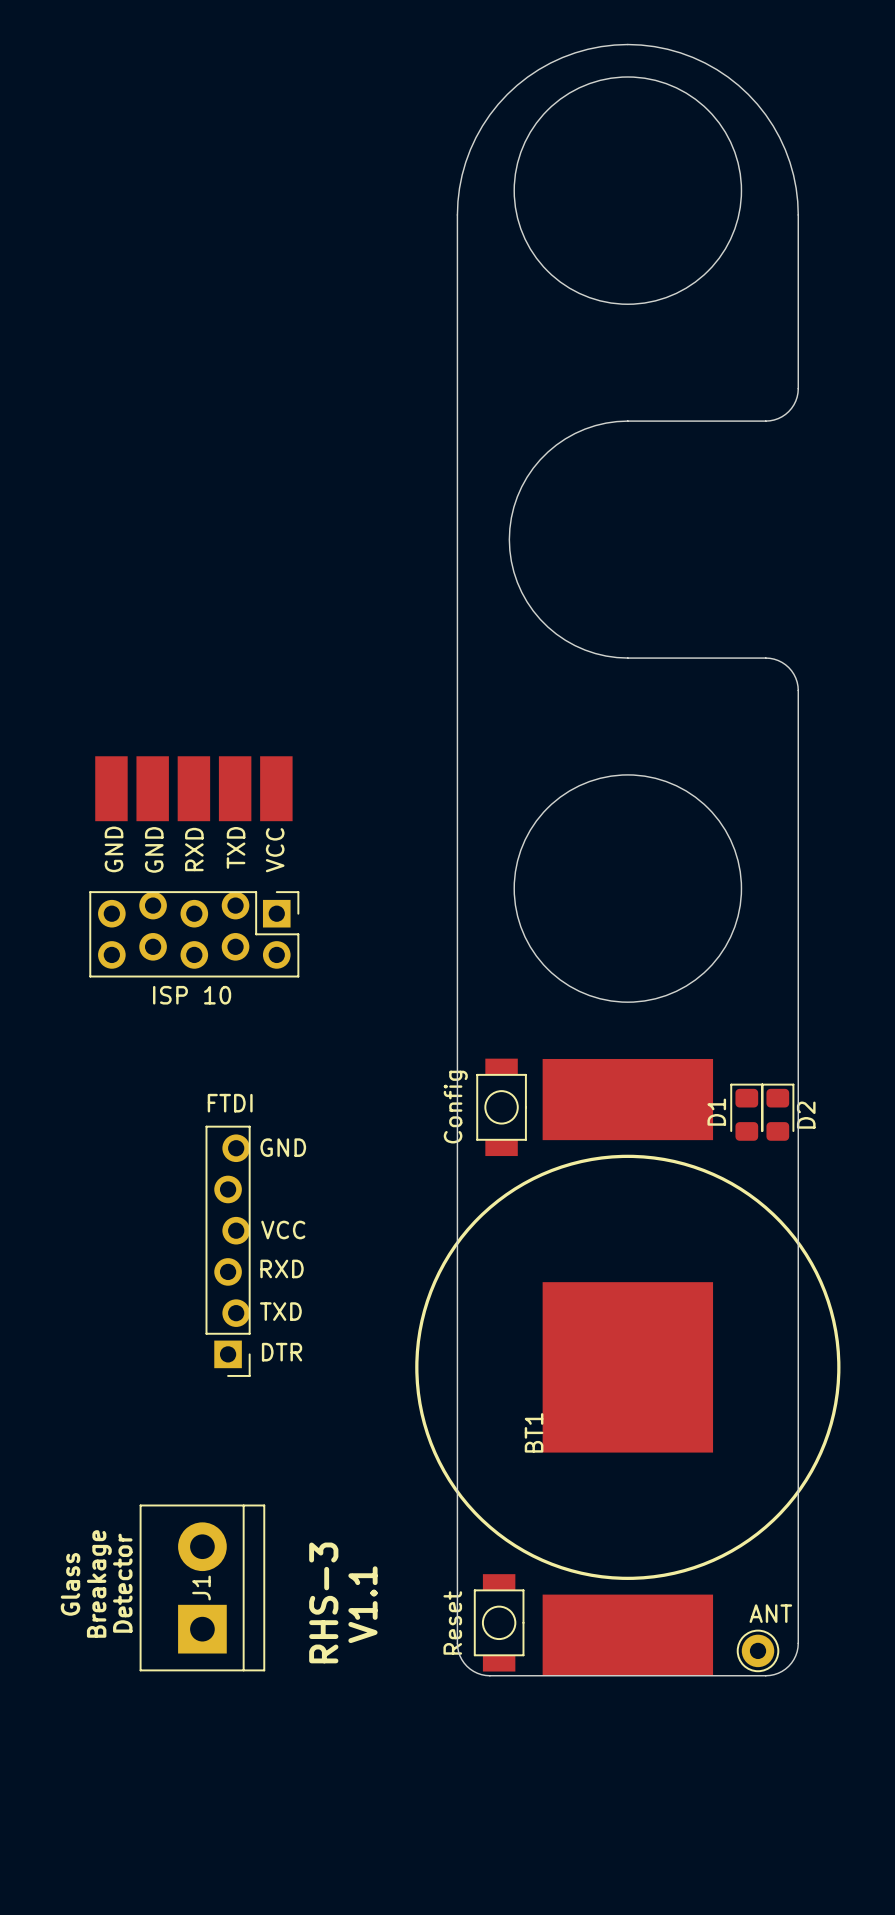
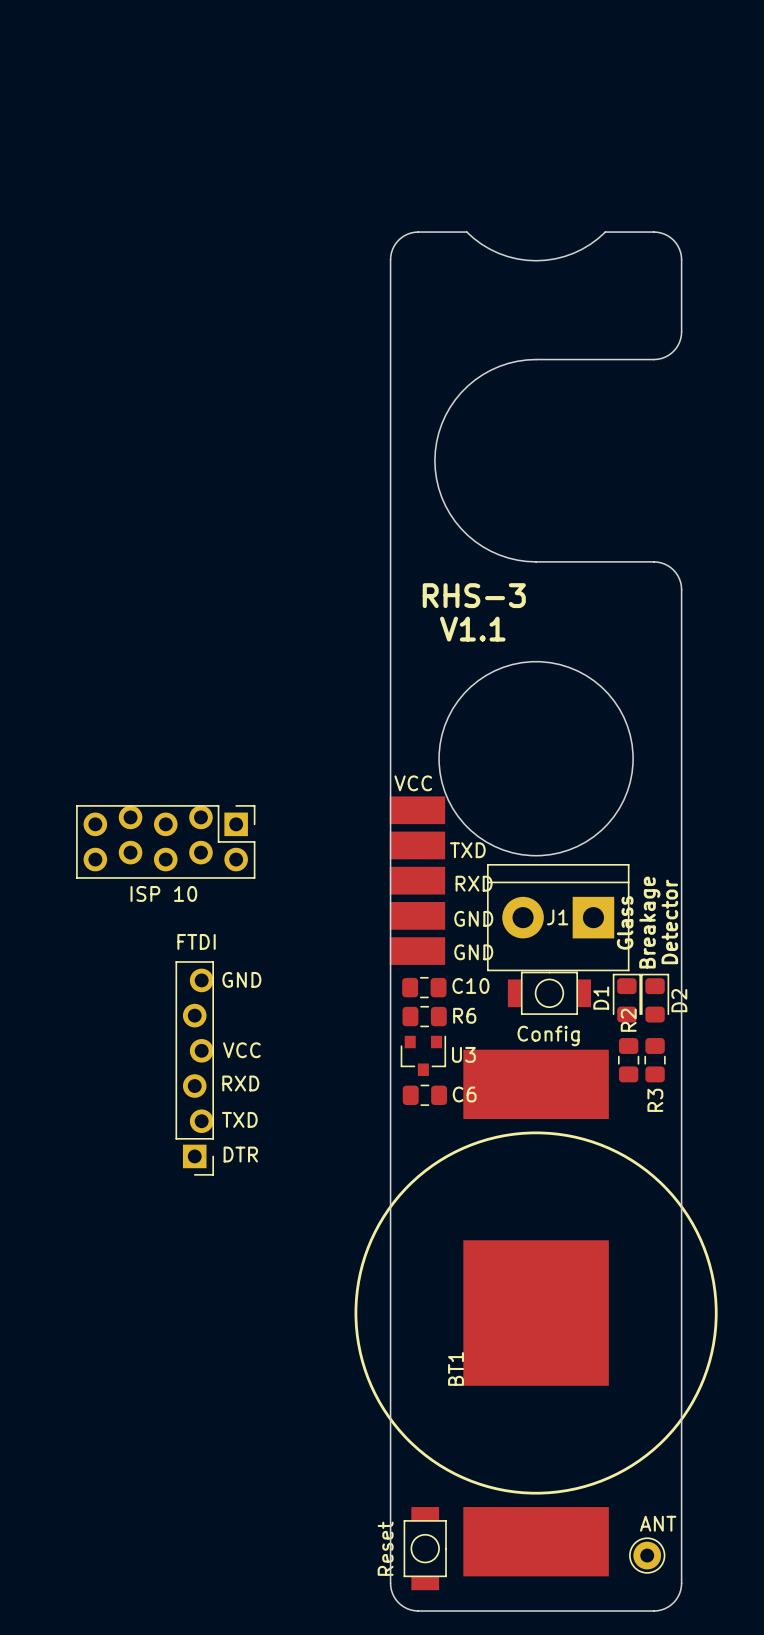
round board edge: [513, 76, 742, 305] -> none
board edge: (457, 304) (457, 214) (459, 188) (470, 149) (482, 125) (498, 104) (517, 85) (550, 63) (588, 49) (627, 44) (667, 49) (705, 63) (738, 85) (757, 104) (773, 125) (785, 149) (796, 188) (798, 214) (798, 304) -> (390, 259) (392, 249) (398, 240) (407, 234) (418, 232) (466, 232) (481, 244) (498, 253) (516, 258) (536, 260) (555, 258) (573, 253) (590, 244) (605, 232) (657, 232) (667, 235) (675, 242) (681, 259)
text: none -> RHS-3 (474, 595)
text: none -> V1.1 (472, 629)
part rotation: 0° (193, 788) -> 90° clockwise (417, 880)
part position: (193, 788) -> (417, 880)
text rotation: 0° (236, 847) -> 90° clockwise (467, 850)
text position: TXD (236, 847) -> TXD (467, 850)
text: GND (114, 849) -> none
text: GND (154, 849) -> none
text rotation: 0° (194, 849) -> 90° clockwise (474, 883)
text position: RXD (194, 849) -> RXD (474, 883)
text rotation: 0° (275, 850) -> 90° clockwise (413, 783)
text position: VCC (275, 850) -> VCC (413, 783)
part position: (194, 934) -> (165, 841)
text: none -> GND (473, 918)
text: none -> Detector (669, 921)
text: none -> Glass (625, 922)
text: none -> Breakage (649, 922)
part rotation: 0° (501, 1107) -> 90° counterclockwise (549, 993)
part position: (501, 1107) -> (549, 993)
D1 position: (746, 1112) -> (626, 998)
D2 position: (777, 1112) -> (655, 998)
text: none -> GND (473, 952)
C10: none -> (424, 987)
R6: none -> (424, 1016)
U3: none -> (423, 1055)
R2: none -> (628, 1060)
R3: none -> (655, 1060)
C6: none -> (424, 1095)
BT1 position: (627, 1367) -> (536, 1313)
text: Breakage (99, 1583) -> none
text: Detector (122, 1583) -> none
text: Glass (70, 1584) -> none
J1 rotation: 0° (202, 1587) -> 90° counterclockwise (558, 917)
J1 position: (202, 1587) -> (558, 917)
text: RHS-3 (323, 1602) -> none
text: V1.1 (362, 1604) -> none
part position: (499, 1622) -> (425, 1548)
board edge: (457, 1643) (459, 1655) (466, 1666) (477, 1673) (489, 1675) (770, 1675) (778, 1673) (788, 1666) (795, 1655) (798, 1643) -> (390, 1403) (390, 1586) (398, 1602) (407, 1608) (418, 1610) (653, 1610) (670, 1605) (677, 1597) (681, 1583) (681, 1403)
part position: (758, 1650) -> (647, 1555)

